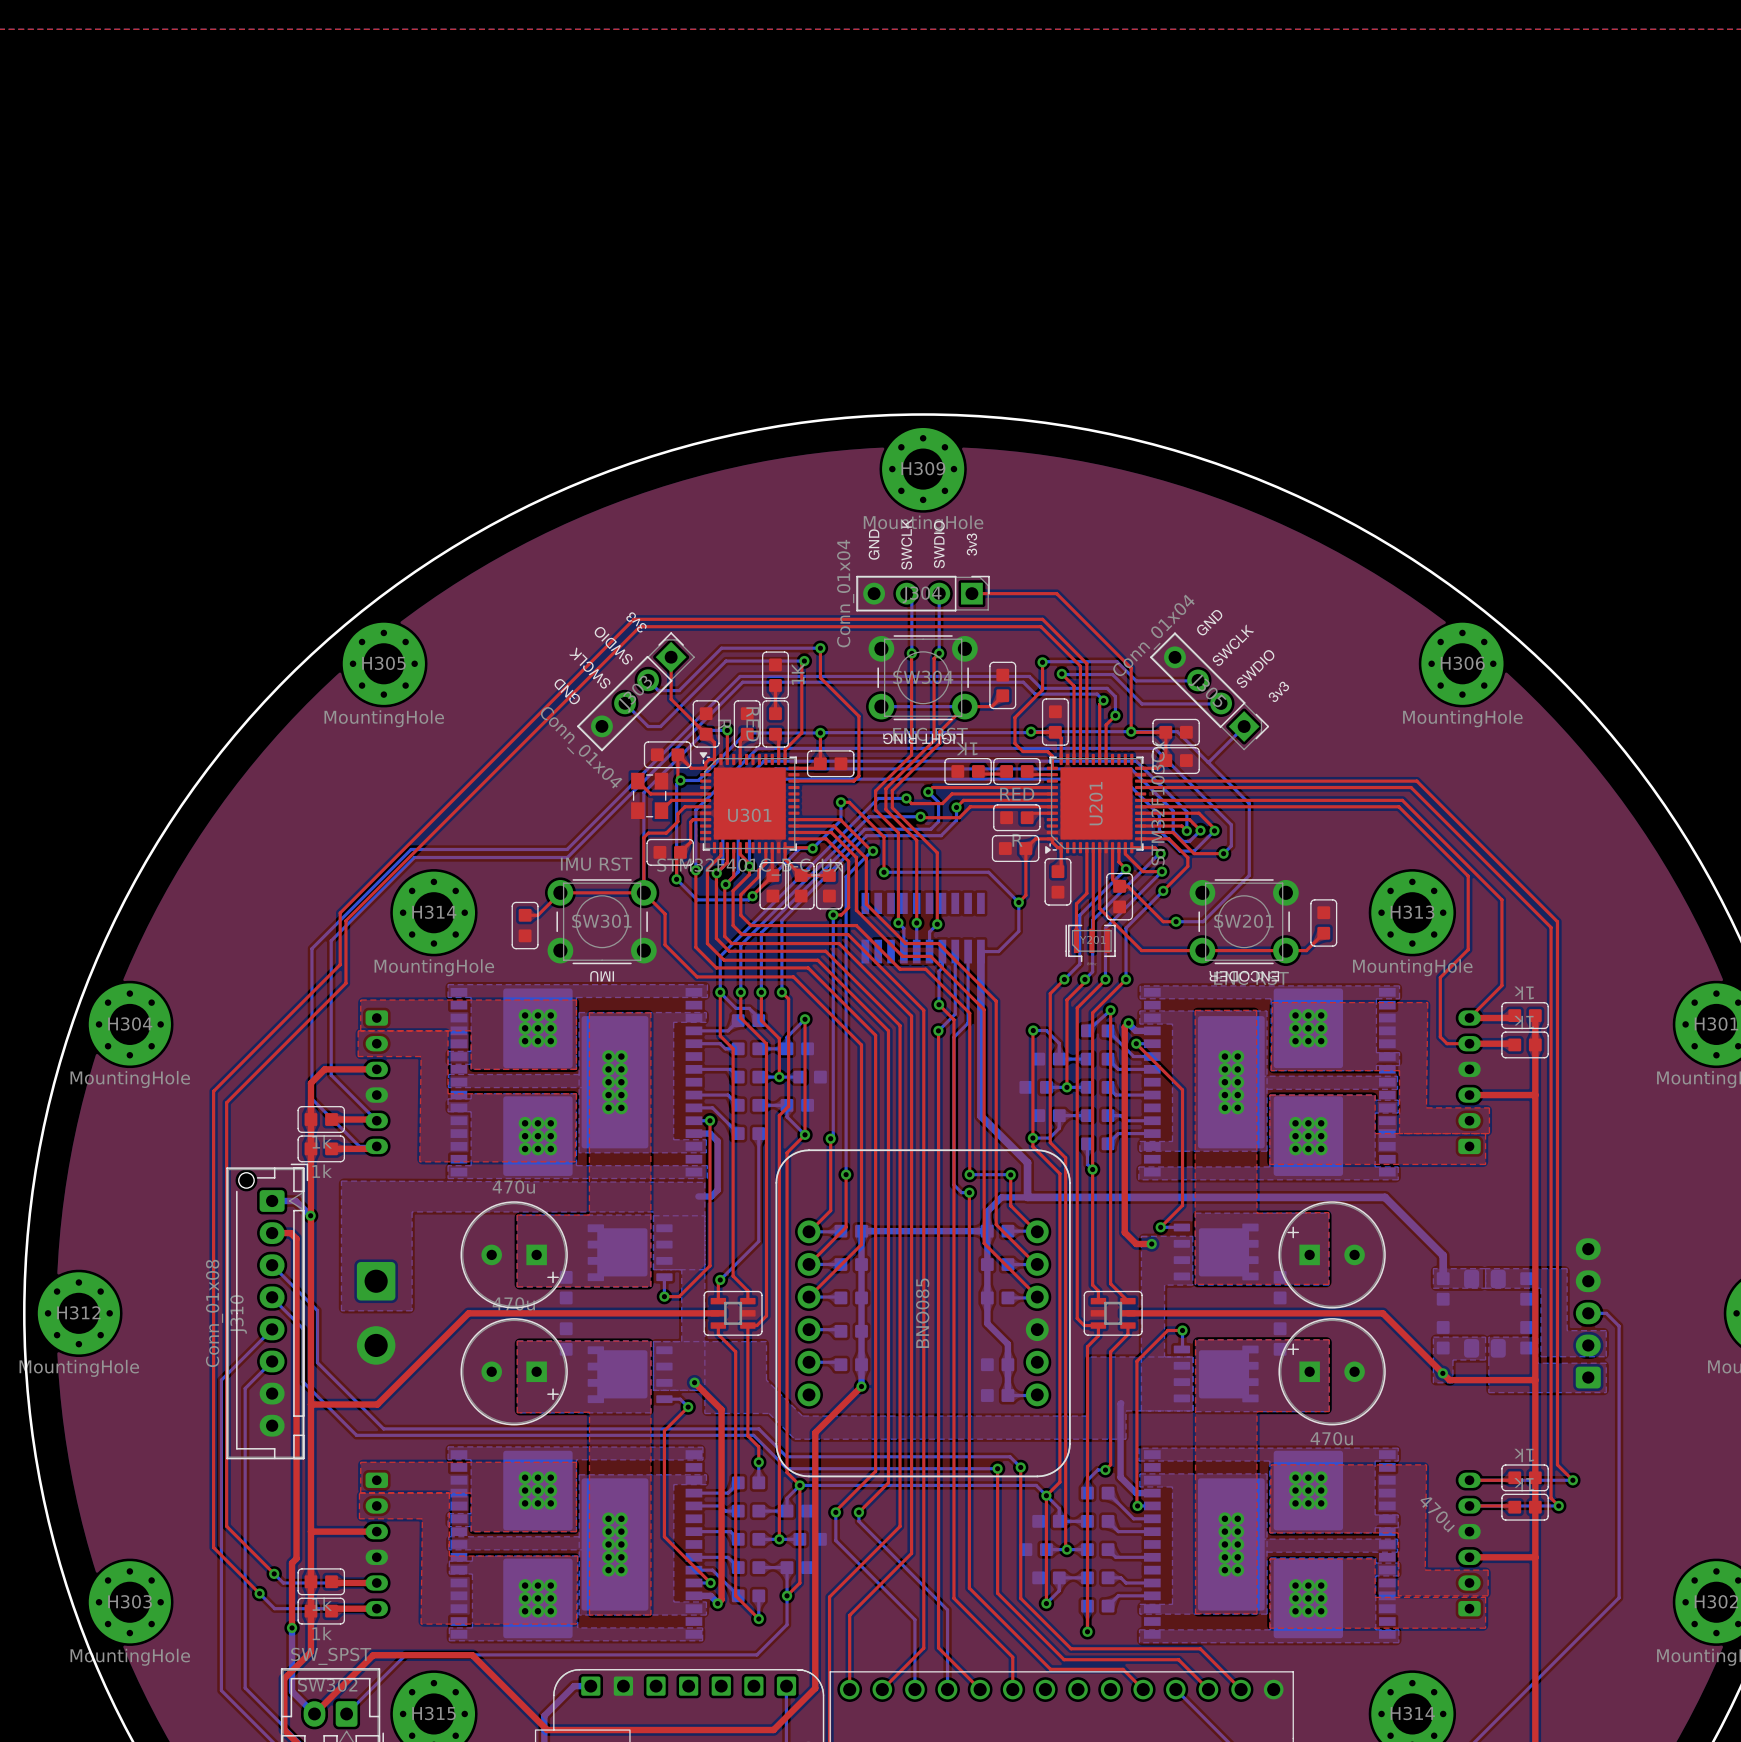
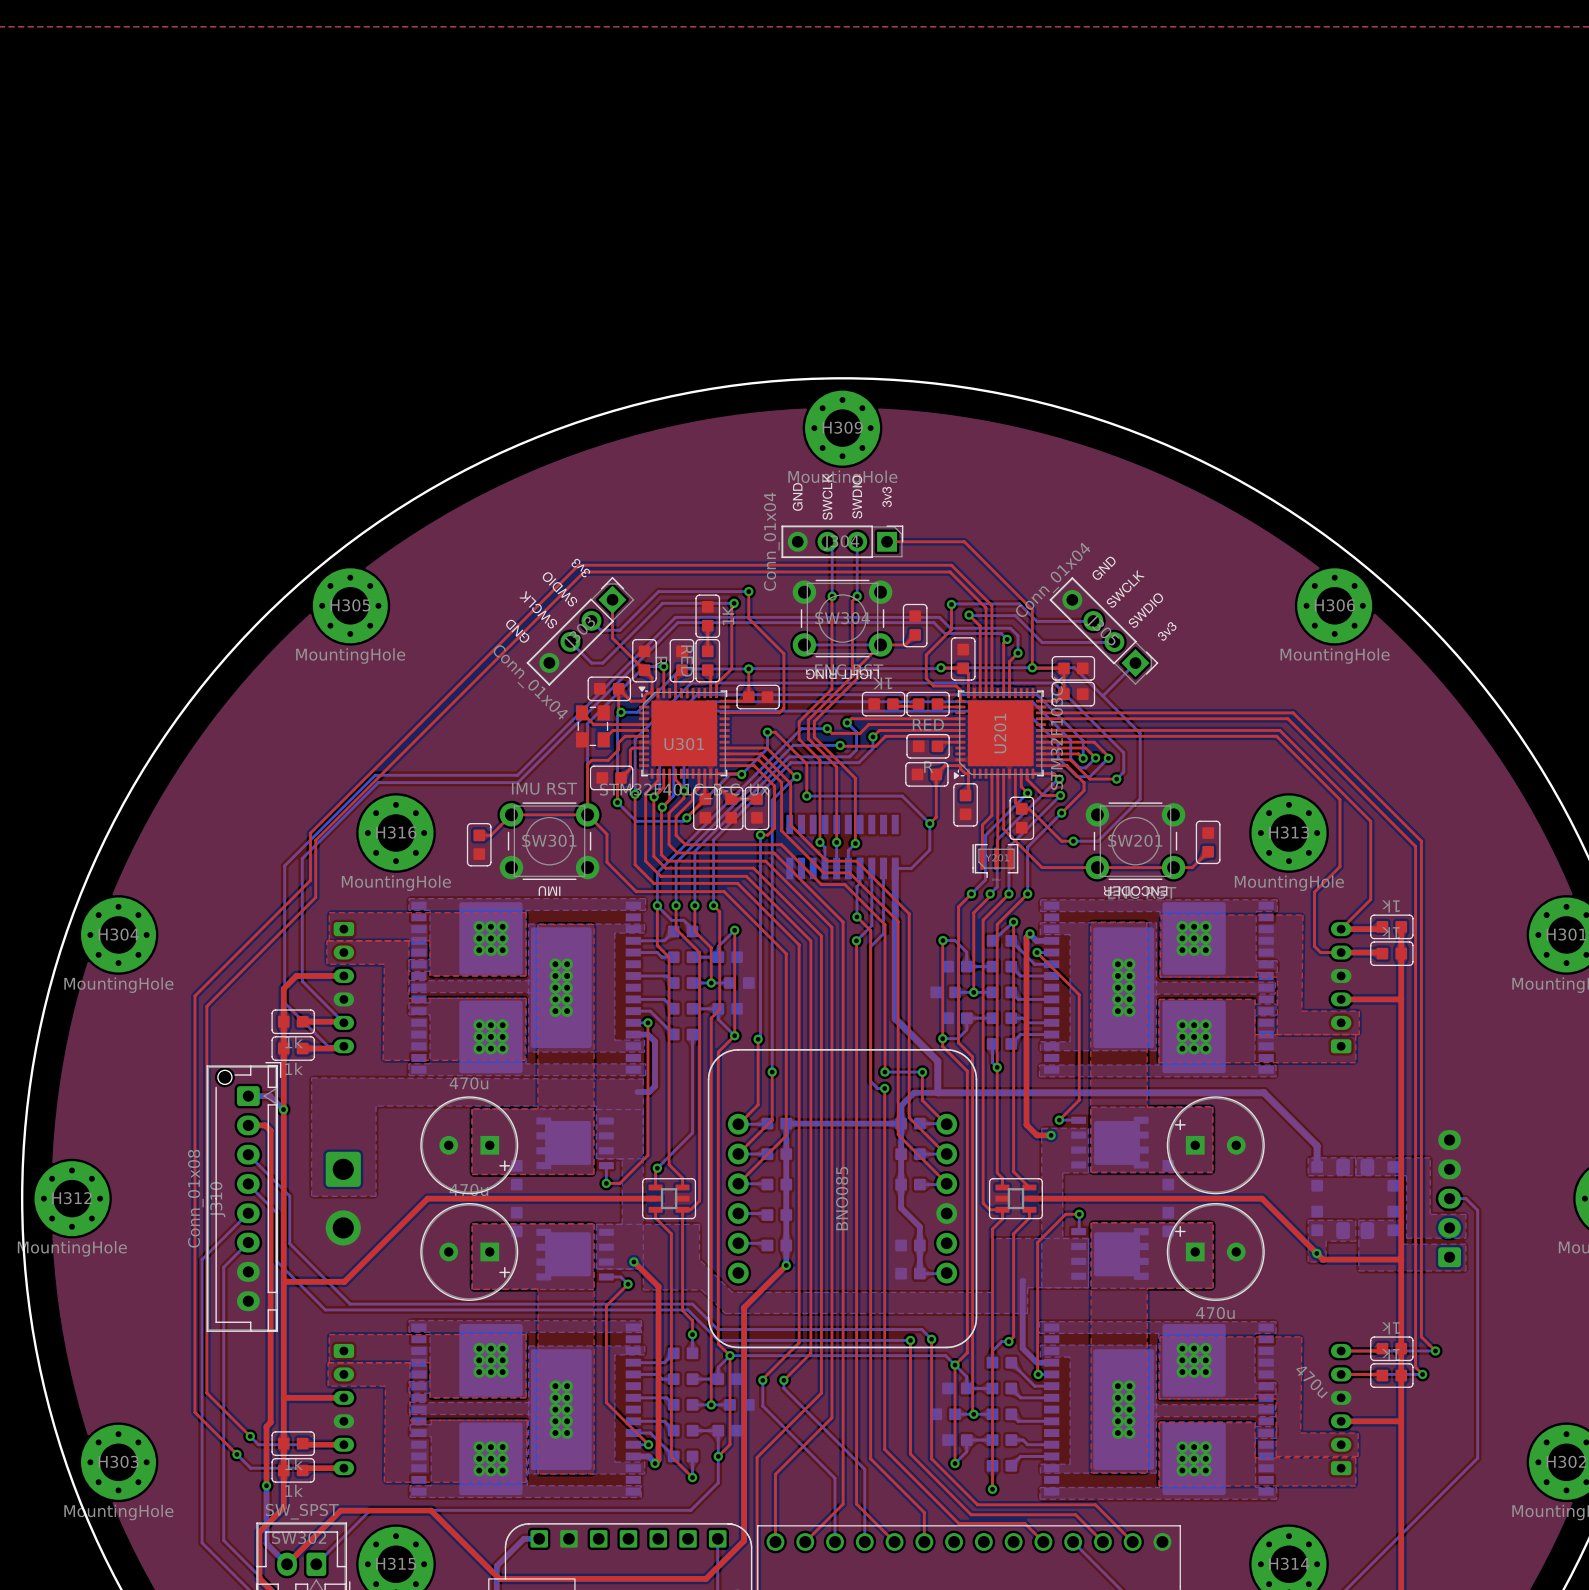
H314 name: H314 (434, 912) -> H316 (396, 832)

